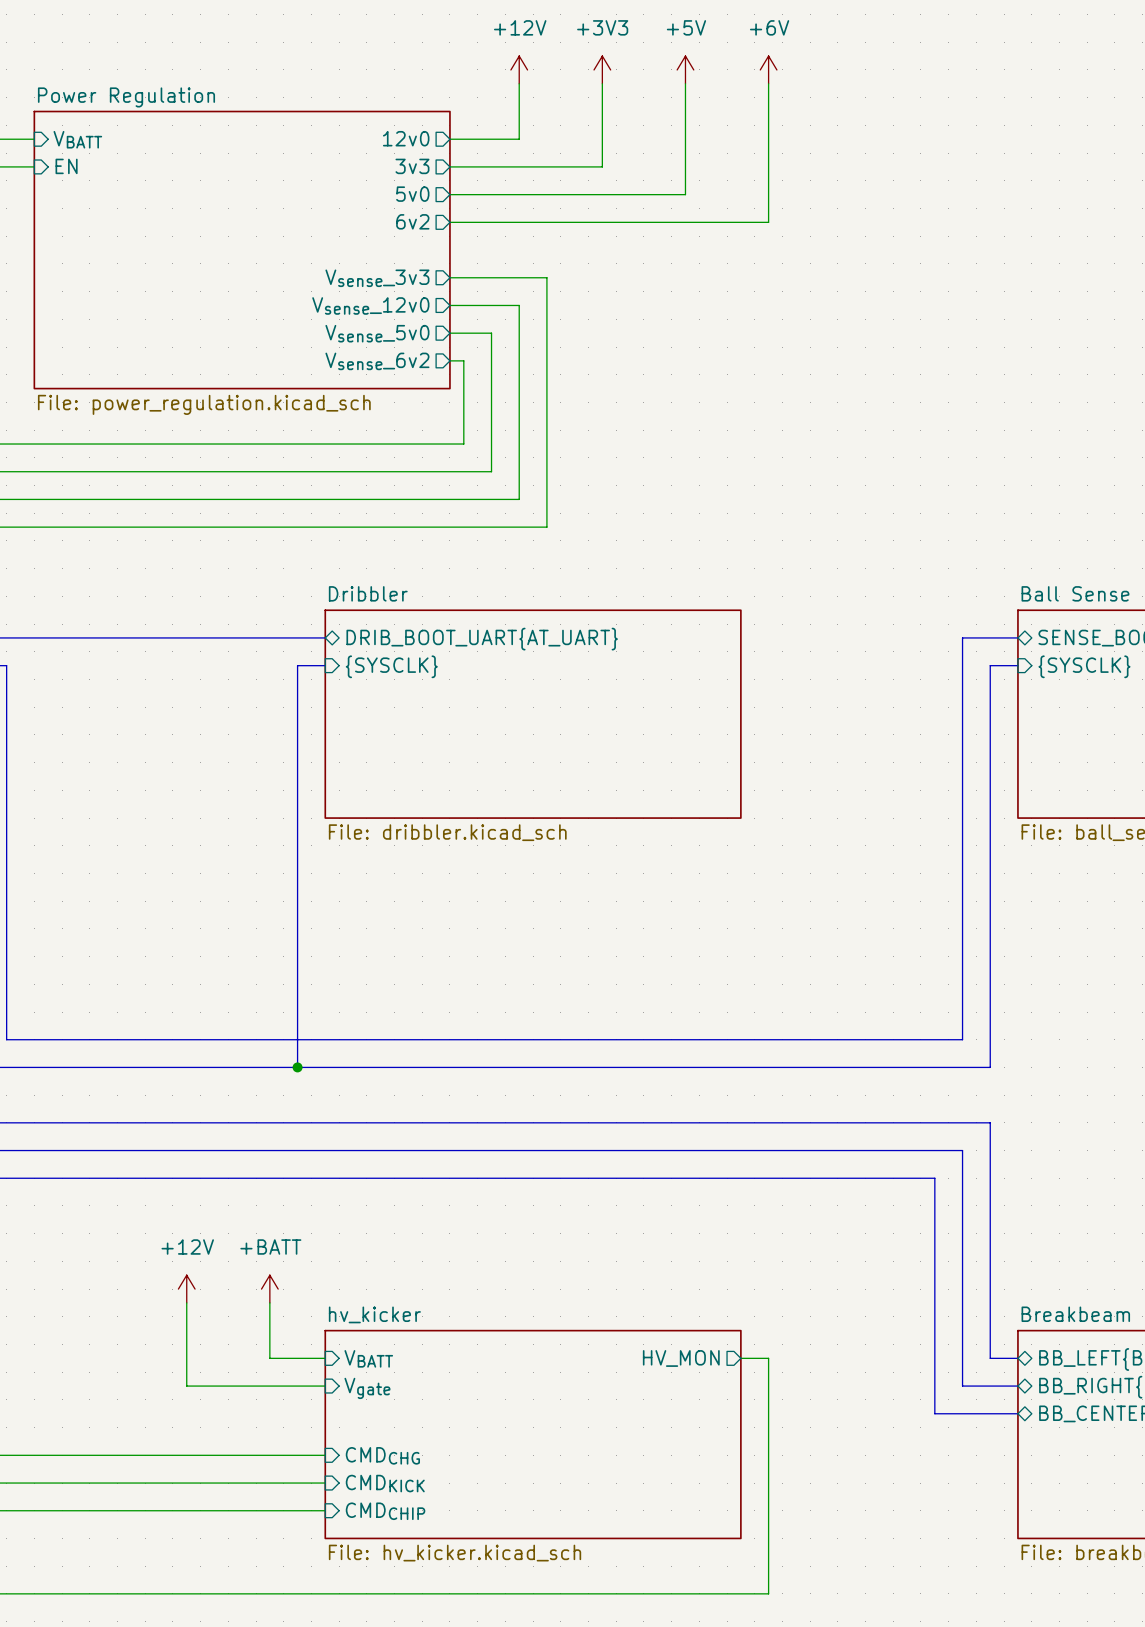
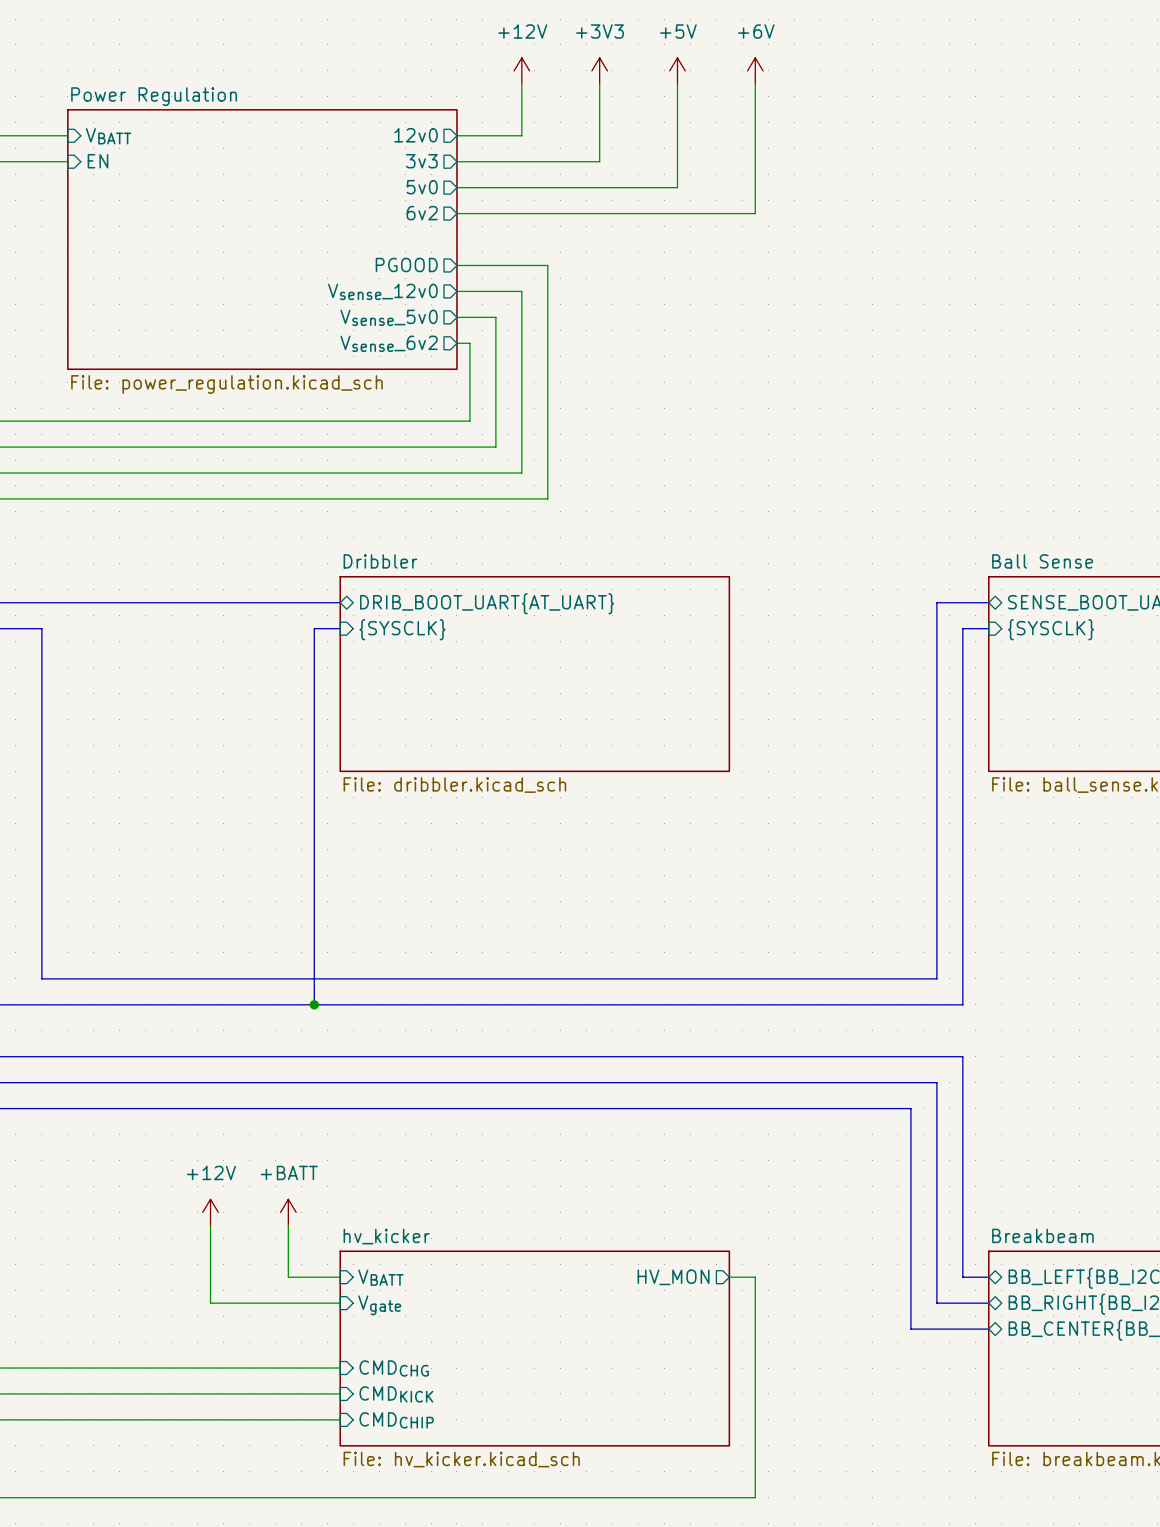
sheet pin: Vsense_3v3 (377, 278) -> PGOOD (406, 264)

